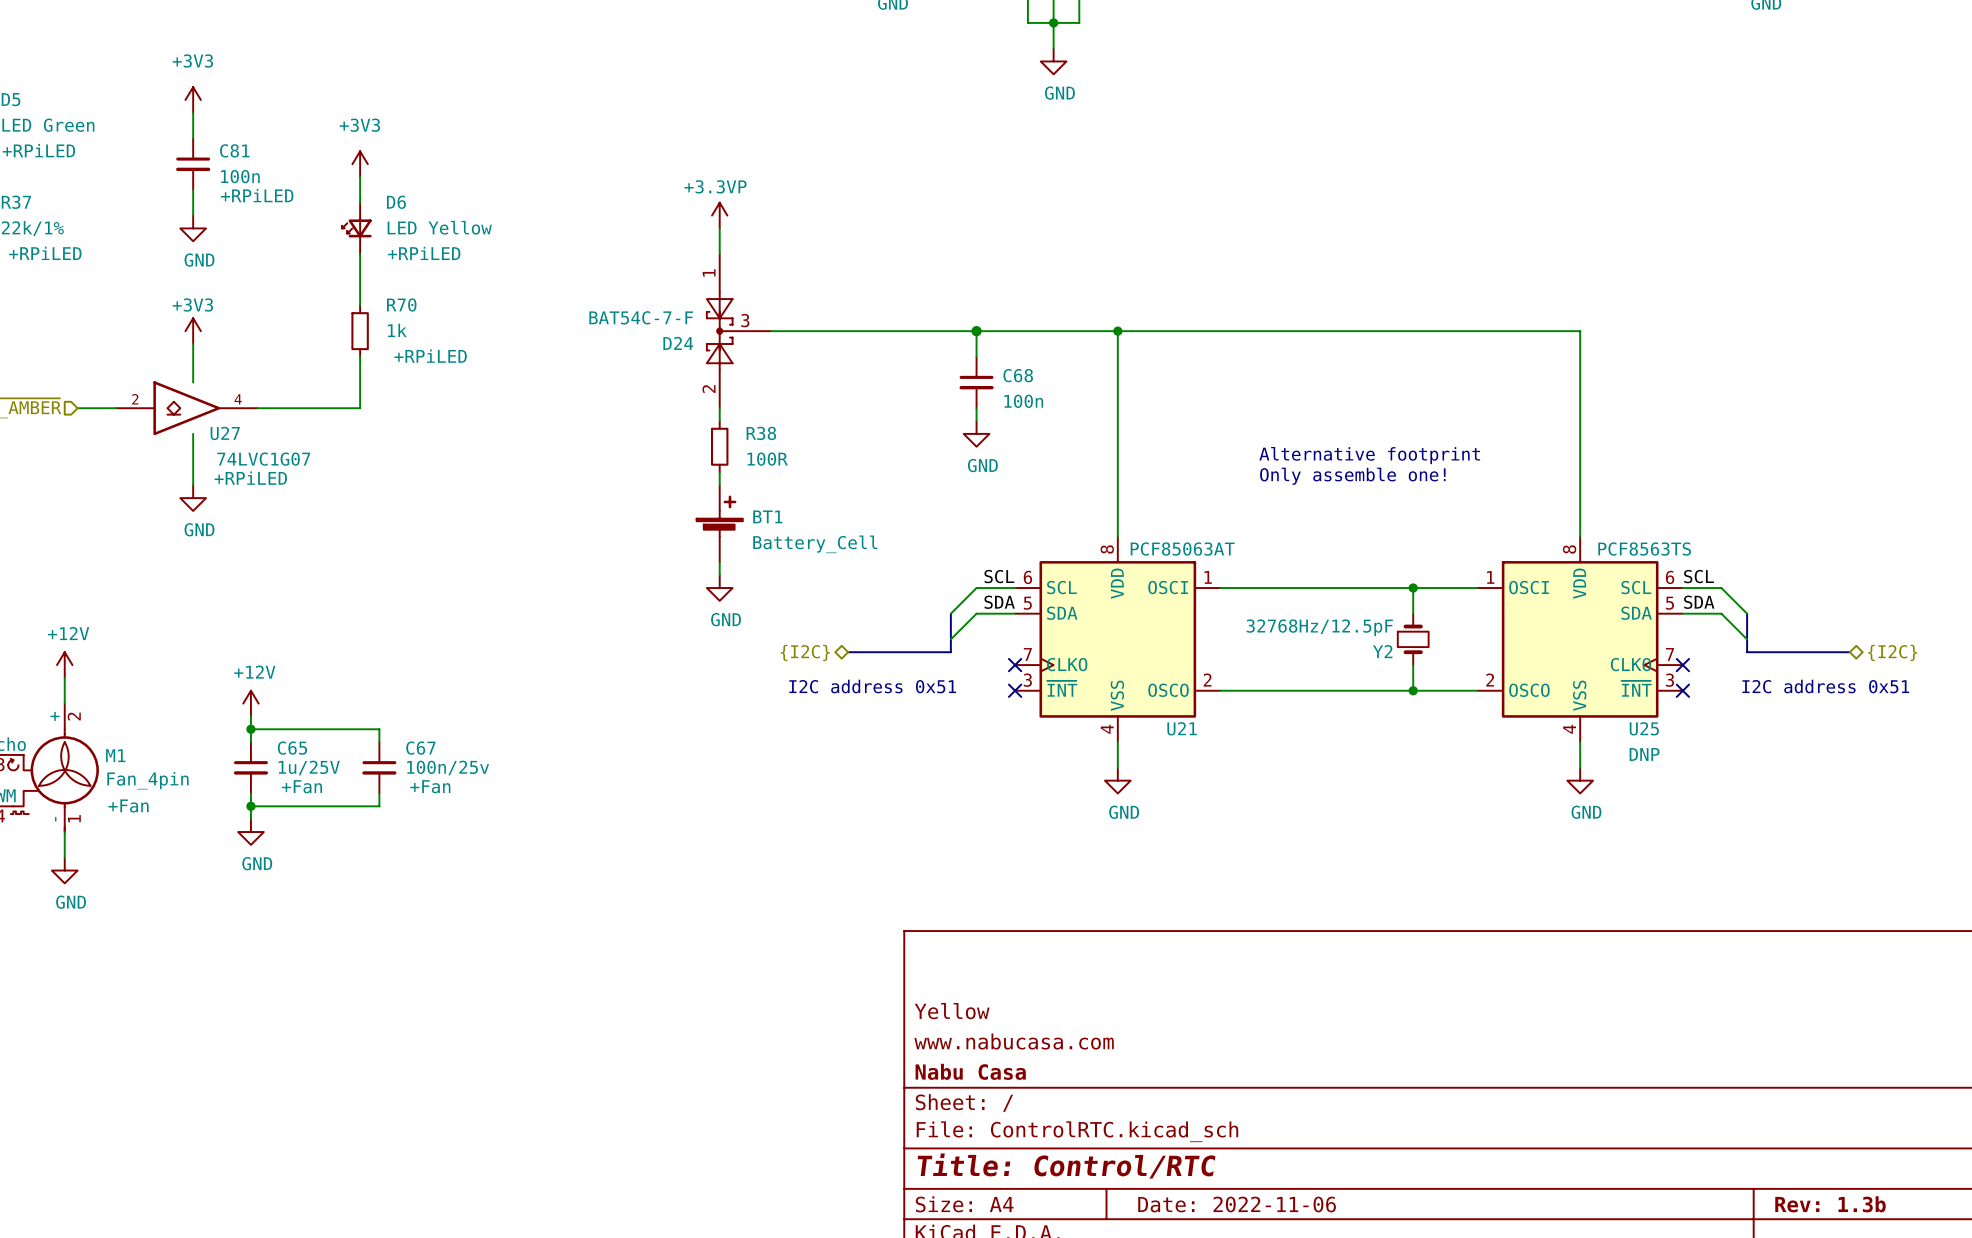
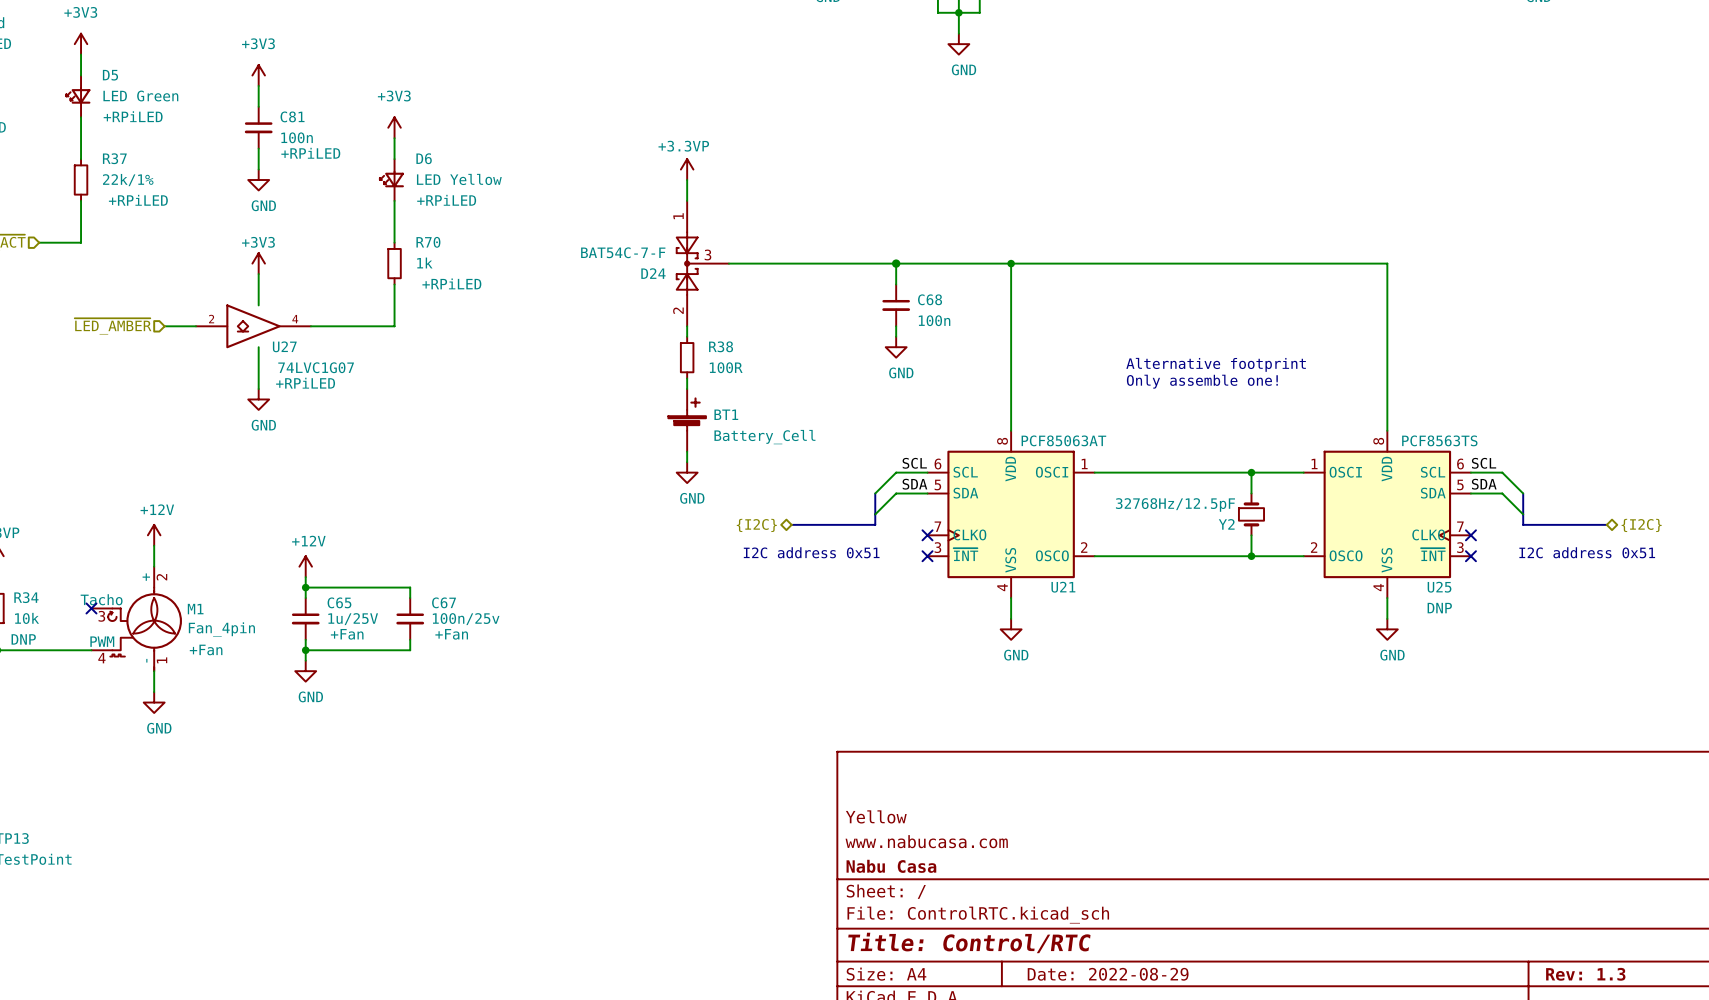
title block: Date: 2022-11-06 (1237, 1204) -> Date: 2022-08-29 (1108, 974)
title block: Rev: 1.3b (1830, 1204) -> Rev: 1.3 (1585, 974)

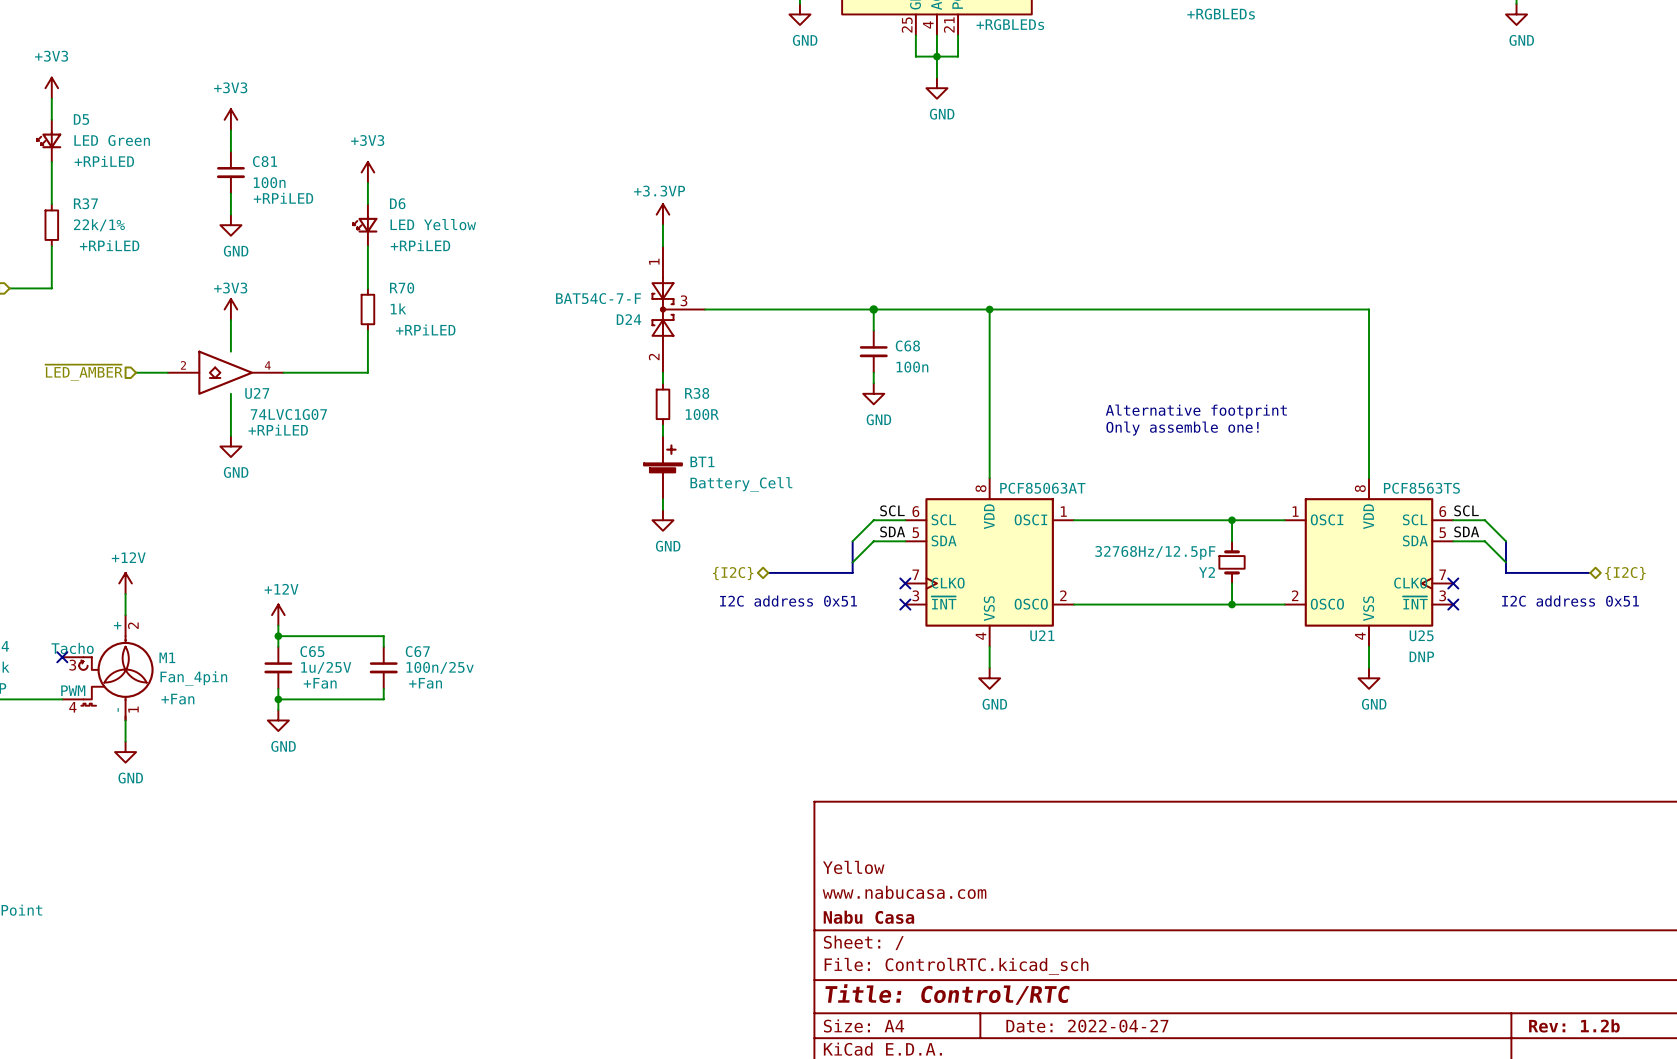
title block: Date: 2022-08-29 (1108, 974) -> Date: 2022-04-27 (1087, 1026)
title block: Rev: 1.3 (1585, 974) -> Rev: 1.2b (1574, 1025)

